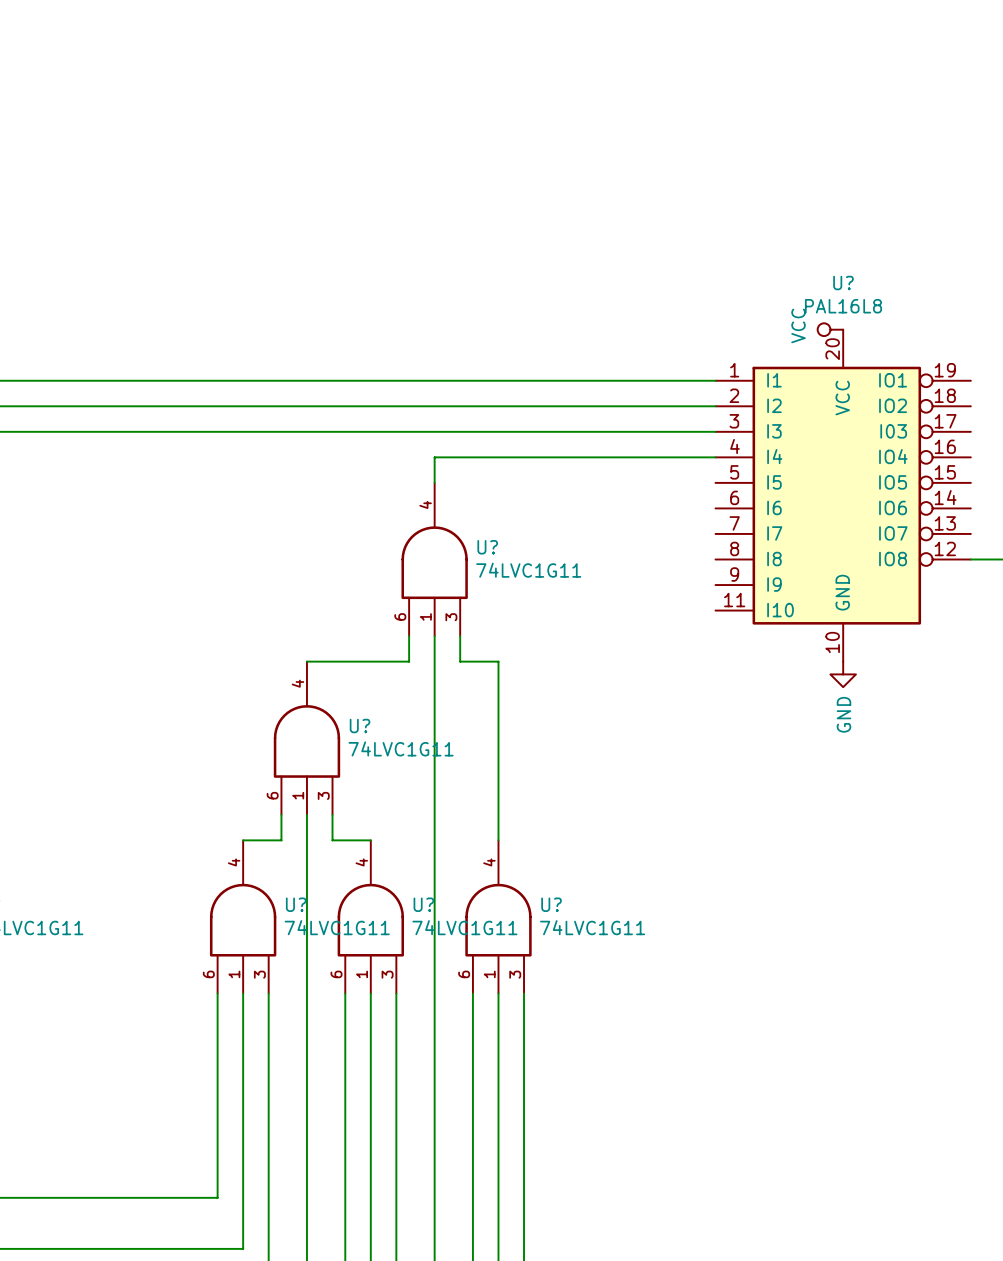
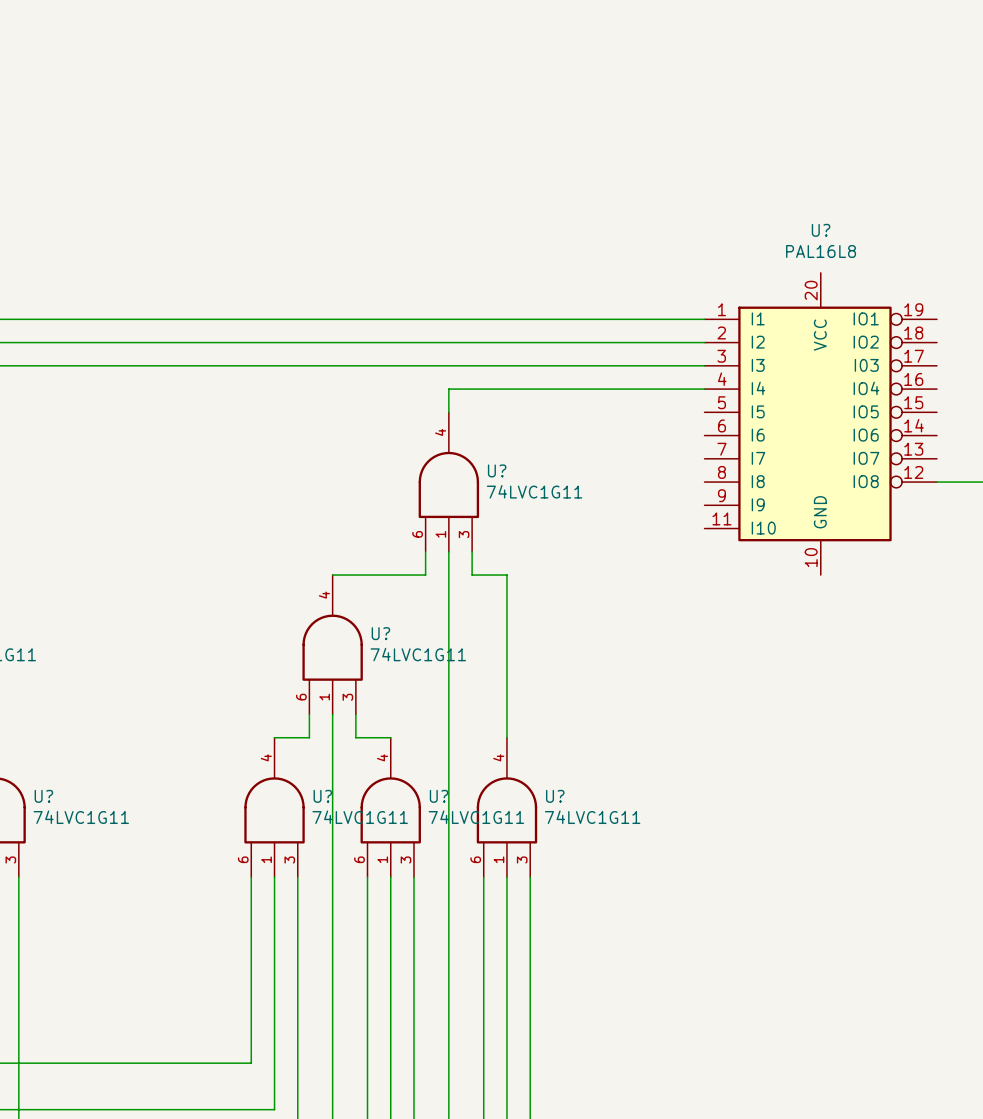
power symbol: VCC (830, 329) -> none
power symbol: GND (843, 674) -> none

